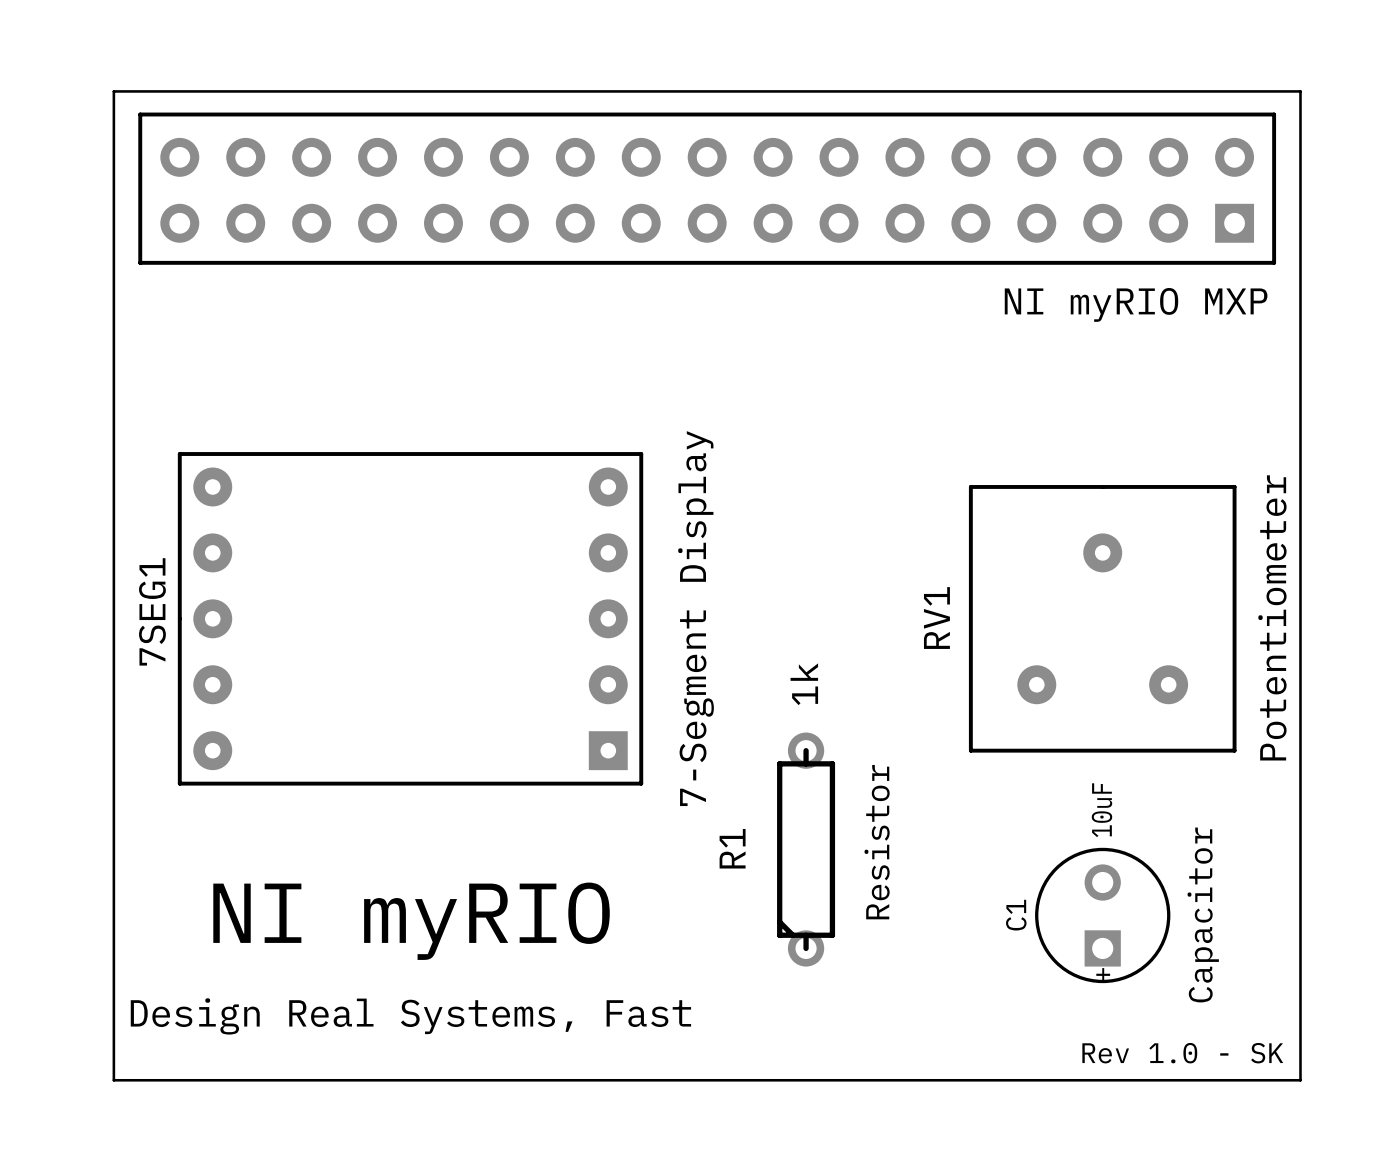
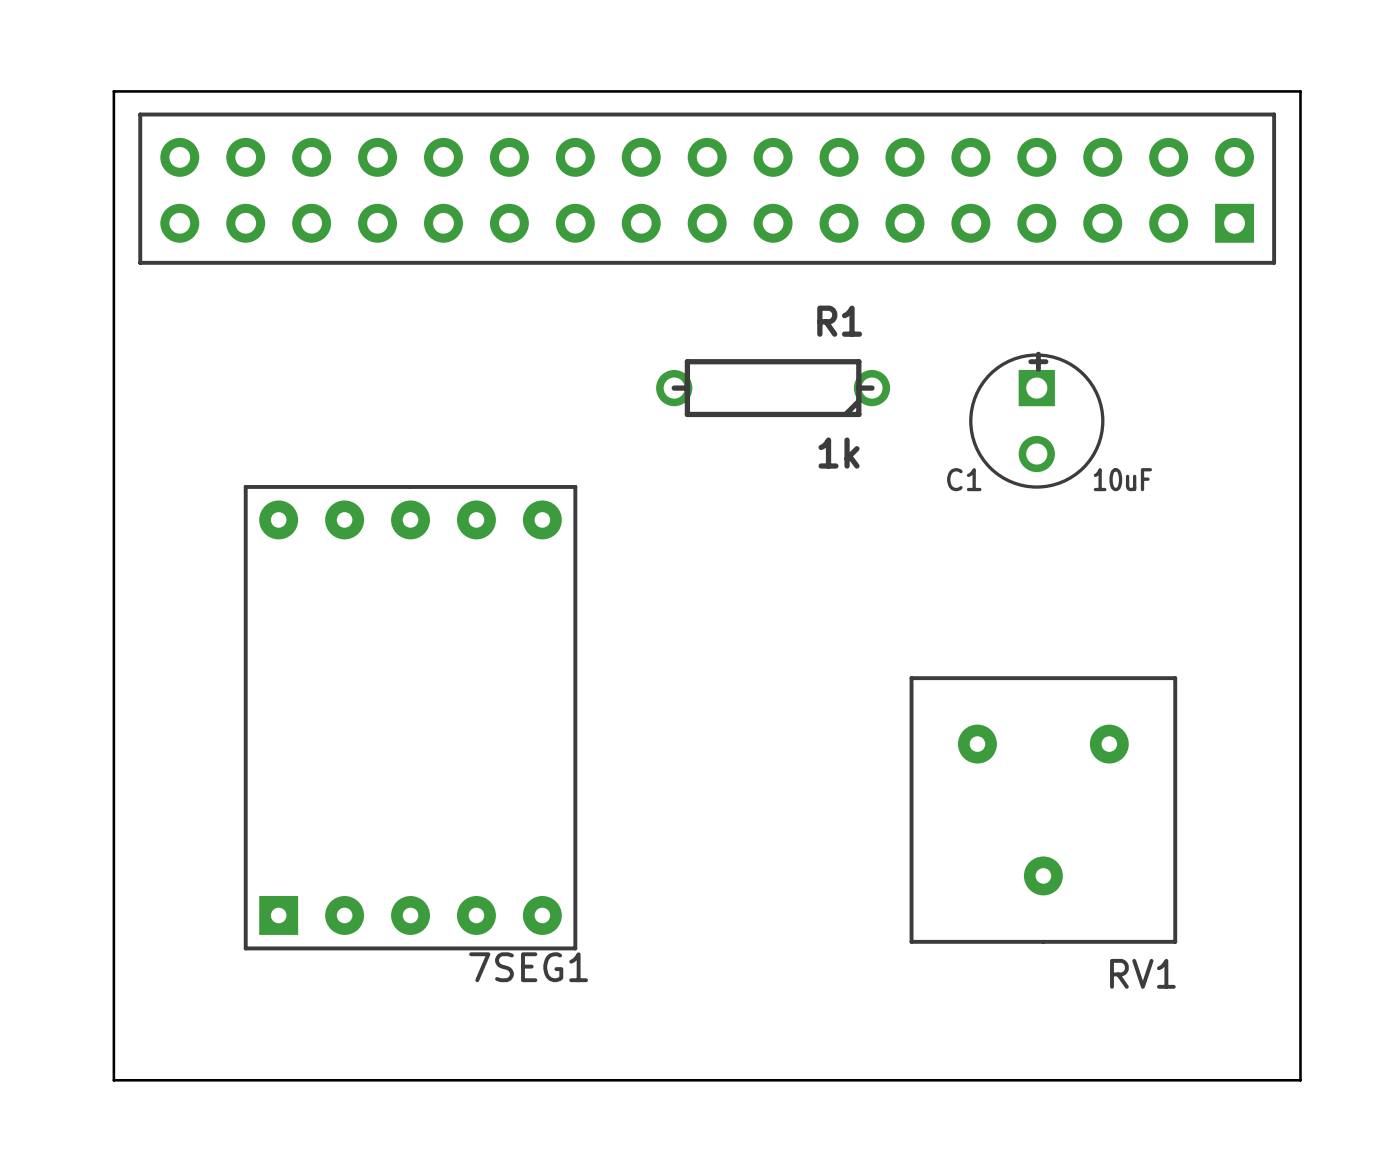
part value: NI myRIO MXP (1136, 304) -> none
7SEG1 name position: 7SEG1 (152, 611) -> 7SEG1 (528, 967)
RV1 value: Potentiometer (1272, 617) -> none
7SEG1 rotation: 0° (410, 618) -> 90° clockwise (410, 717)
7SEG1 value: 7-Segment Display (696, 618) -> none
RV1 name position: RV1 (936, 618) -> RV1 (1142, 973)
RV1 rotation: 0° (1102, 618) -> 180° (1043, 809)
RV1 position: (1102, 618) -> (1043, 809)
R1 value position: 1k (804, 684) -> 1k (839, 453)
C1 value position: 10uF (1101, 810) -> 10uF (1122, 479)
text: Resistor (877, 842) -> none
R1 name position: R1 (732, 848) -> R1 (839, 321)
R1 rotation: 0° (806, 849) -> 90° counterclockwise (773, 388)
R1 position: (806, 849) -> (773, 388)
text: Capacitor (1203, 914) -> none
C1 name position: C1 (1016, 915) -> C1 (964, 479)
C1 rotation: 0° (1102, 915) -> 180° (1036, 421)
C1 position: (1102, 915) -> (1036, 421)
text: NI myRIO (411, 921) -> none
text: Design Real Systems, Fast (410, 1016) -> none
text: Rev 1.0 - SK (1182, 1053) -> none

